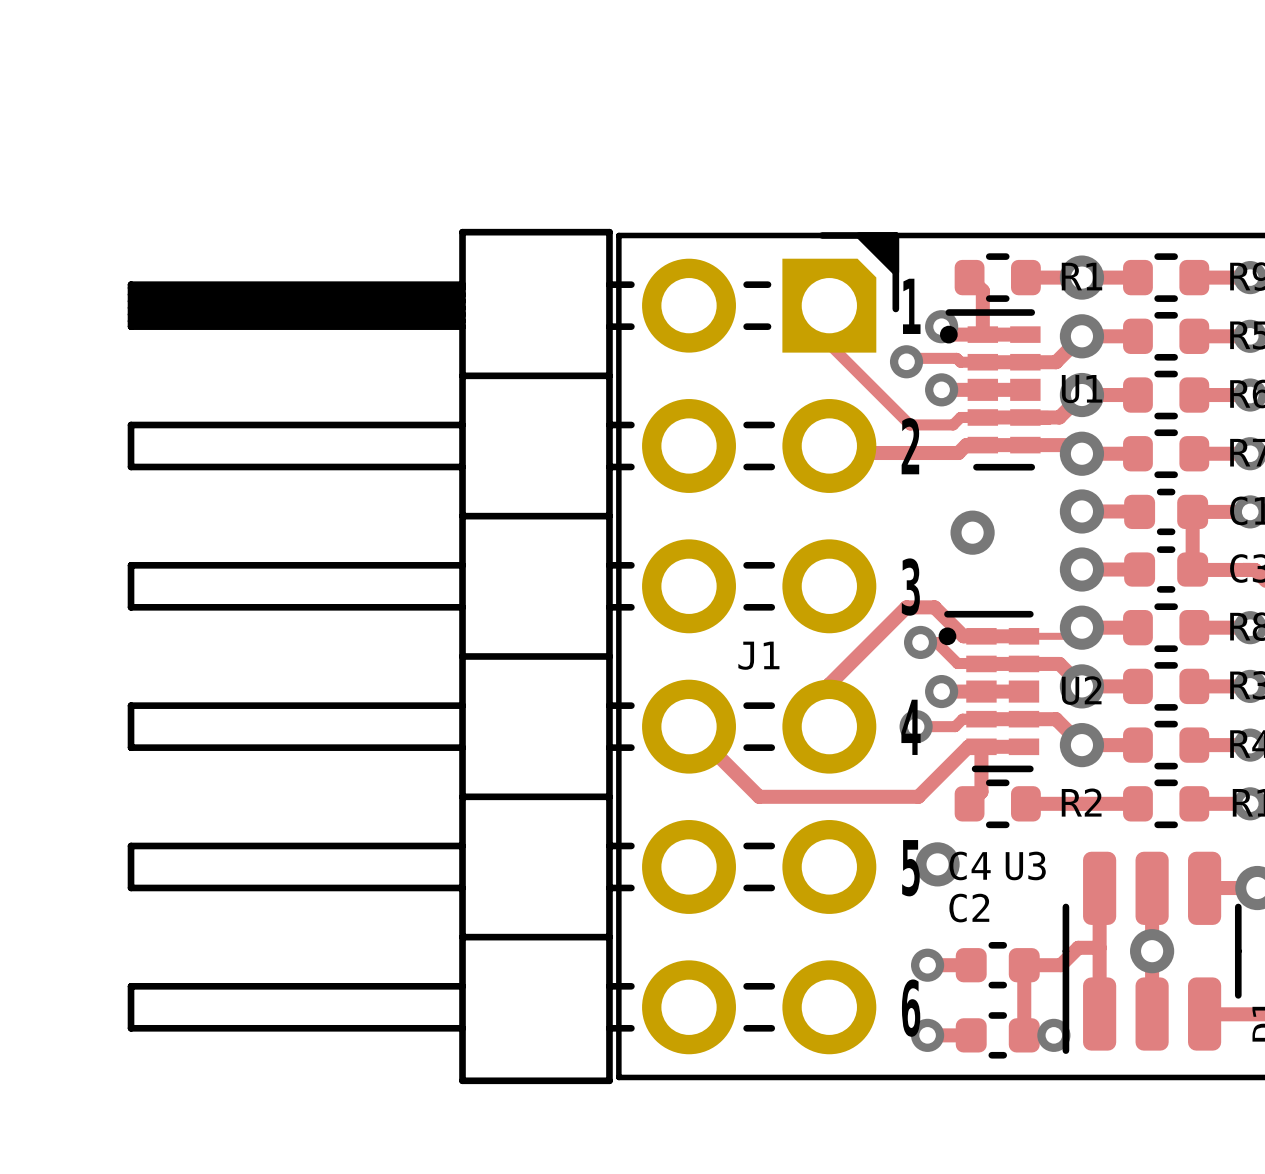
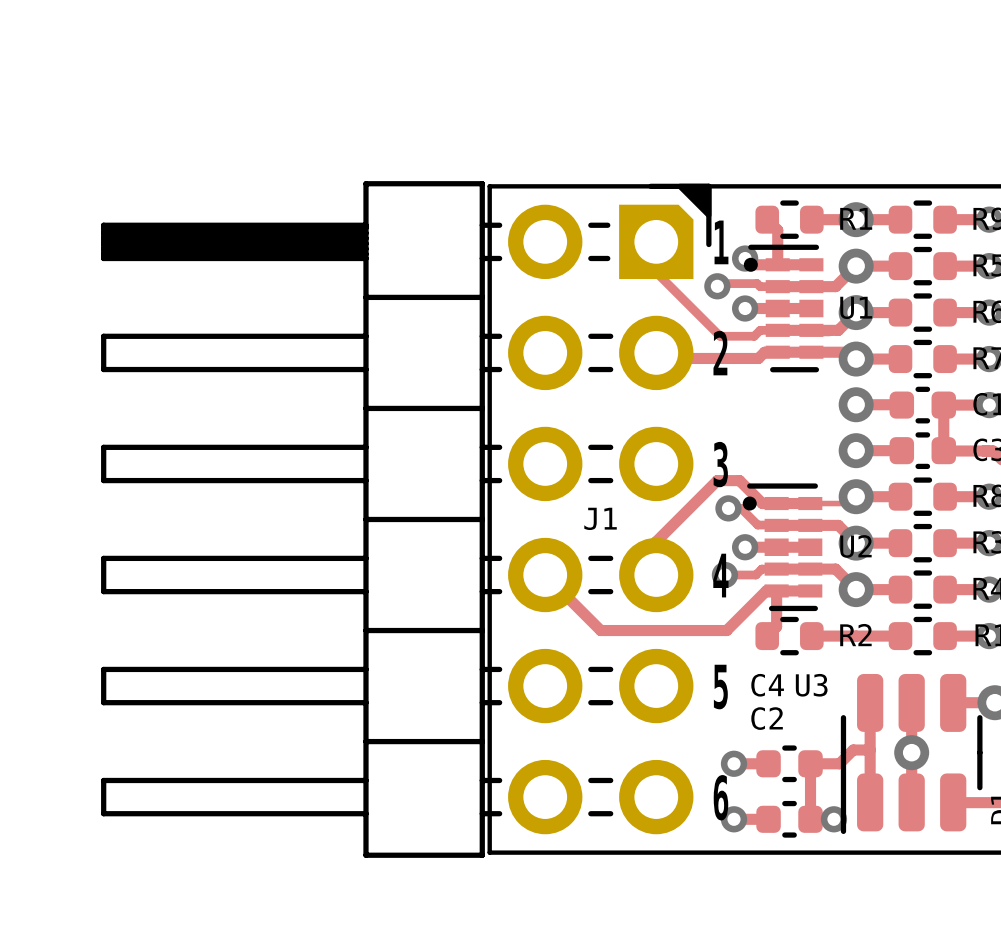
via: (972, 532) -> none
via: (937, 864) -> none

